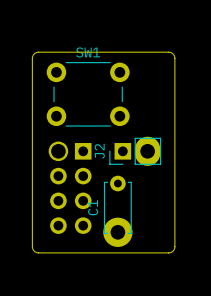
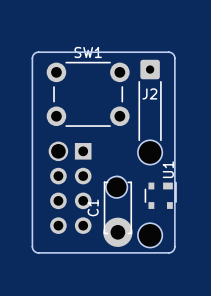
J2 footprint: [109, 136, 162, 166] -> [137, 59, 163, 248]
J2 name position: J2 (99, 151) -> J2 (149, 93)
part: none -> (116, 187)
U1: none -> (160, 195)

